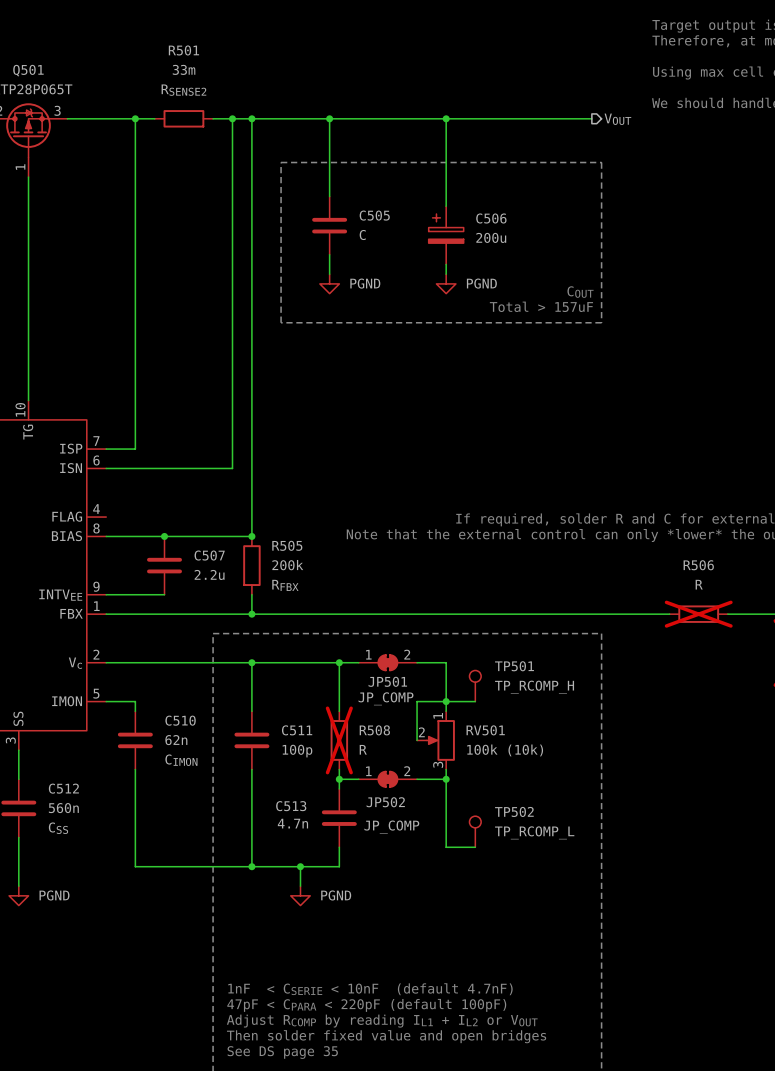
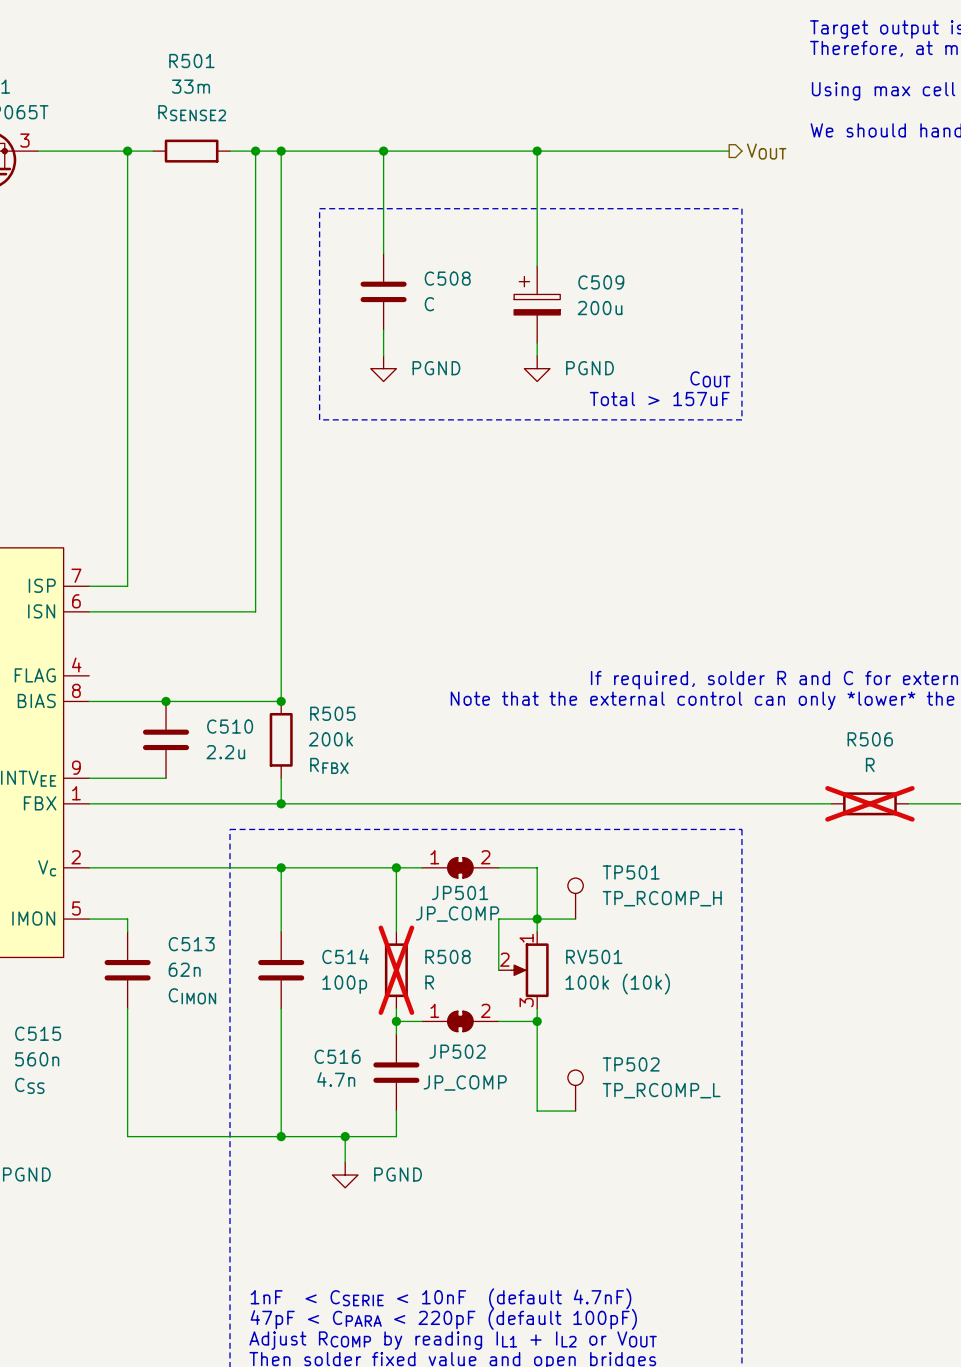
C505 name: C505 (374, 215) -> C508 (447, 278)
C506 name: C506 (491, 218) -> C509 (601, 282)
C507 name: C507 (209, 555) -> C510 (230, 726)
C510 name: C510 (180, 720) -> C513 (191, 944)
C511 name: C511 (297, 730) -> C514 (345, 956)
C512 name: C512 (63, 788) -> C515 (38, 1033)
C513 name: C513 (291, 806) -> C516 (337, 1056)

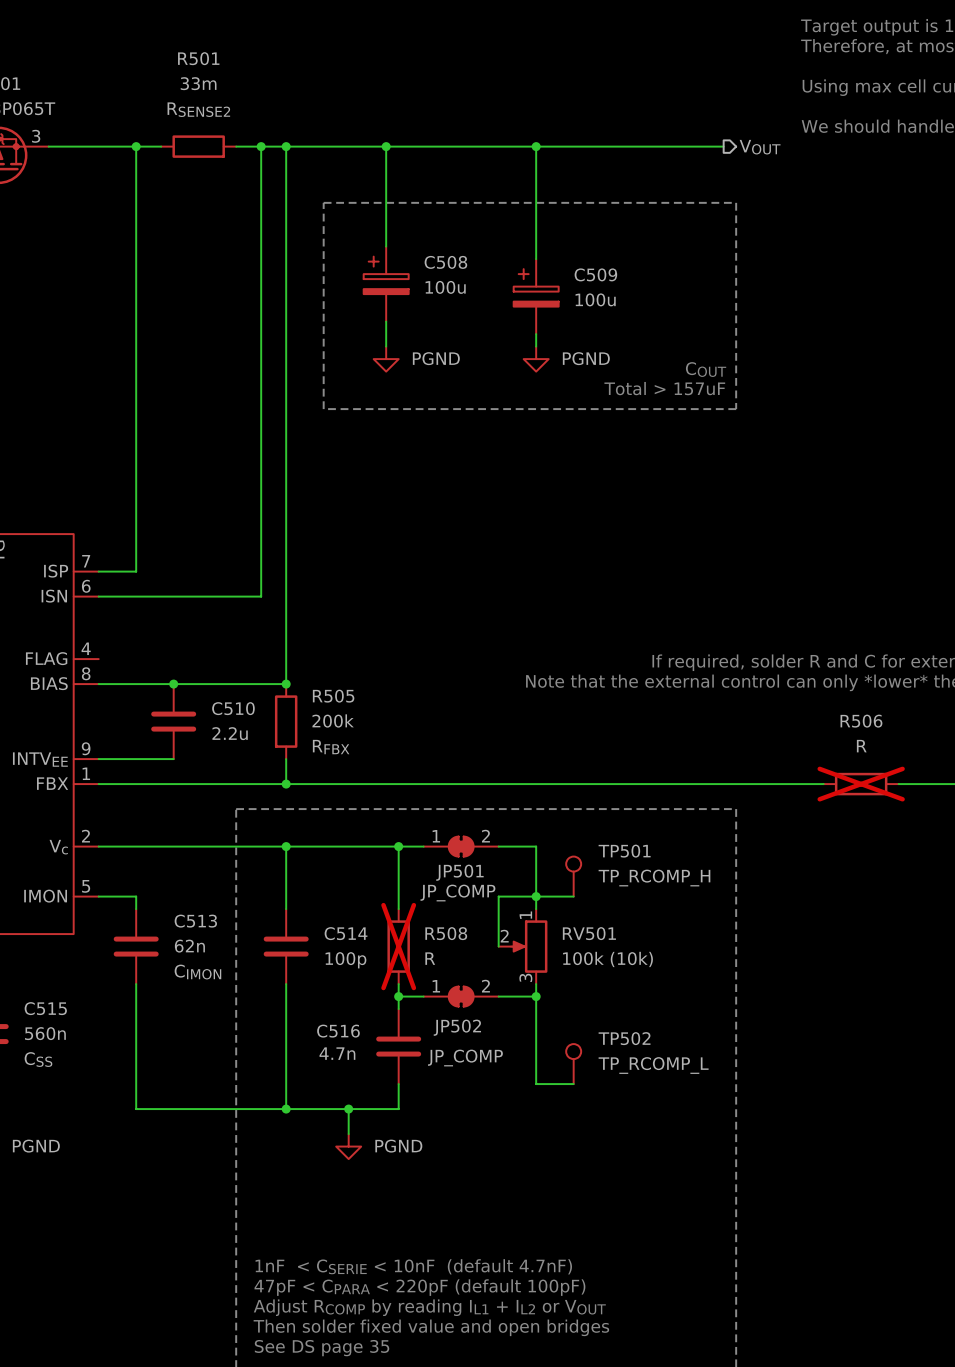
C508 symbol: [360, 253, 407, 331] -> [363, 246, 409, 322]
C508 value: C (429, 304) -> 100u (445, 287)
C509 value: 200u (600, 308) -> 100u (595, 299)

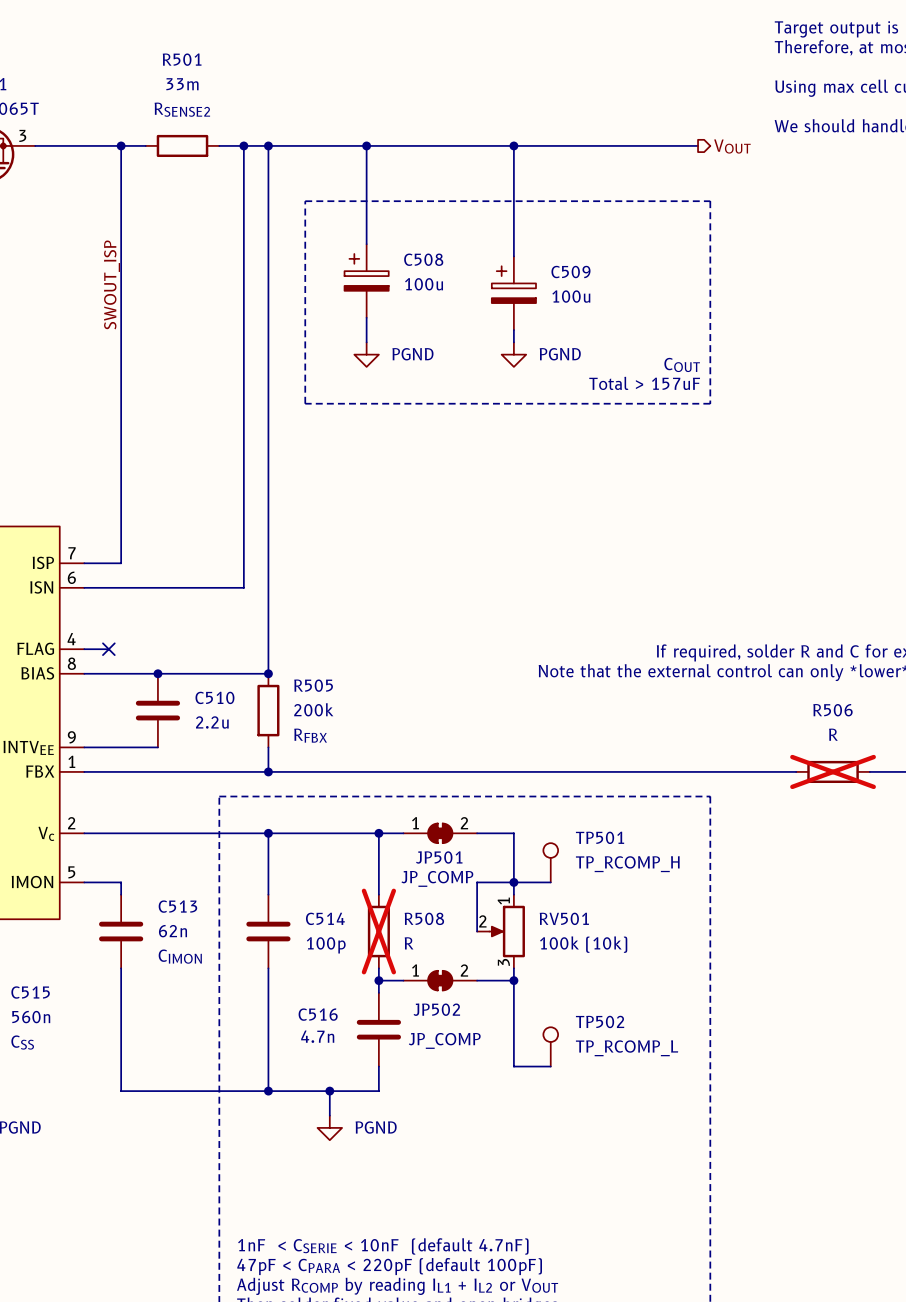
label: none -> SWOUT_ISP (112, 284)
wire: none -> (84, 649) (108, 649)
no-connect mark: none -> (108, 649)

